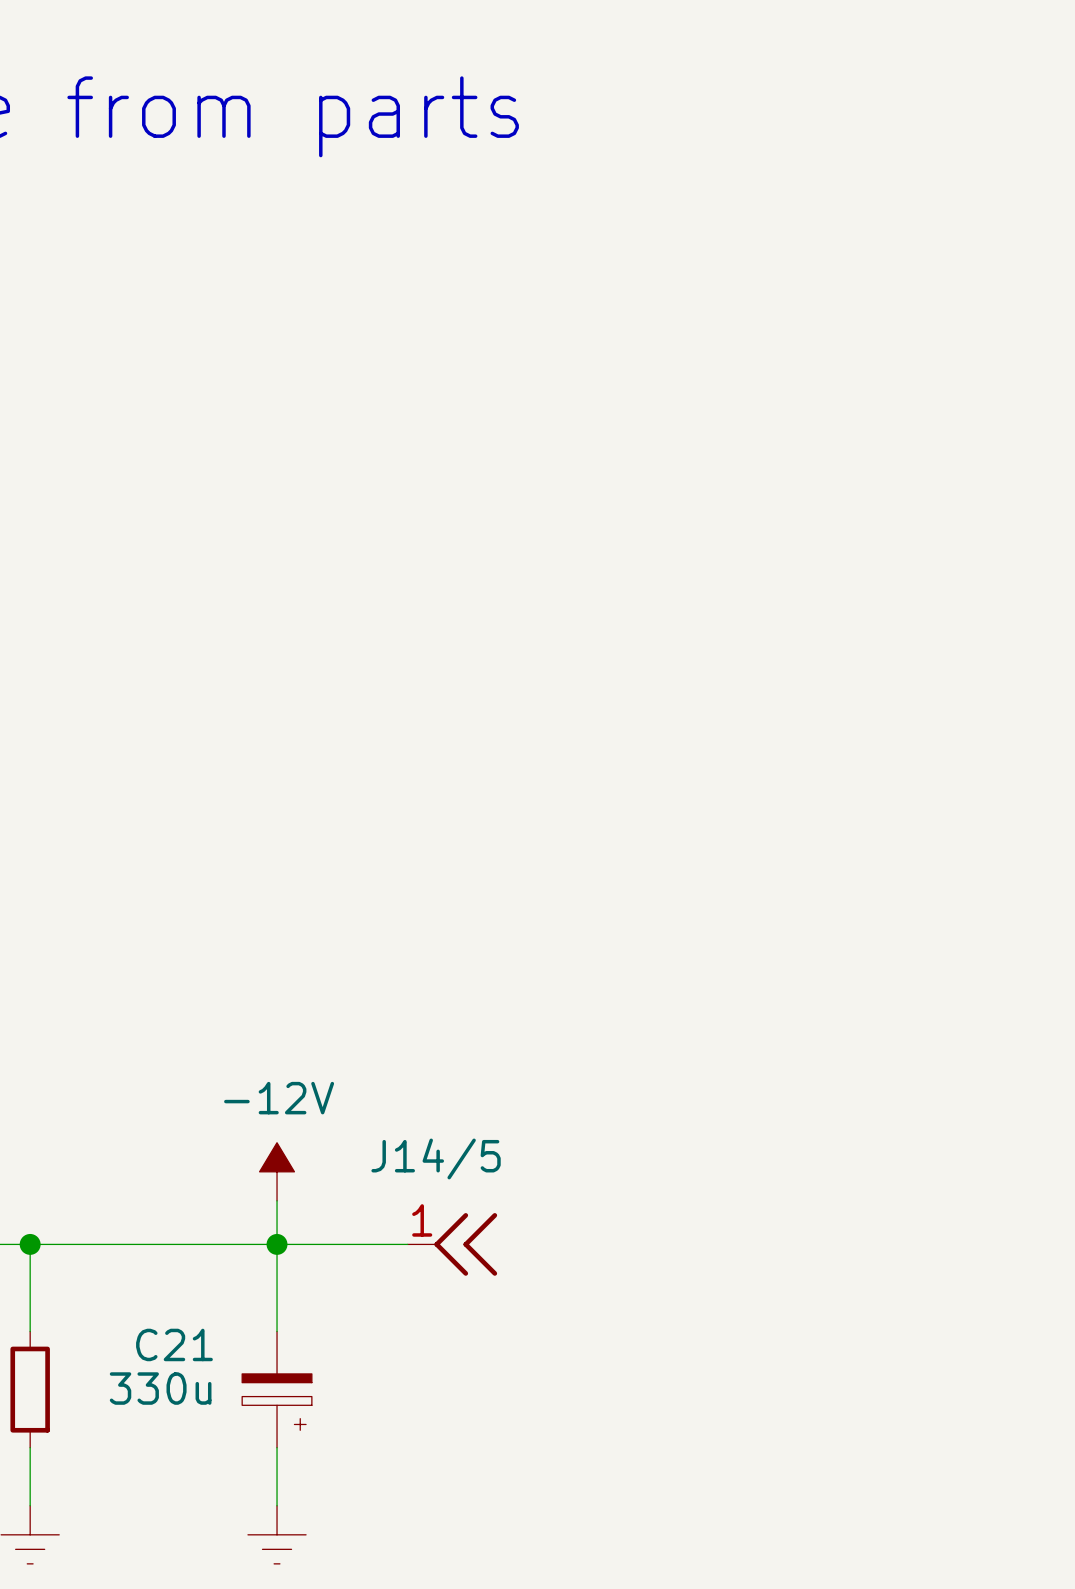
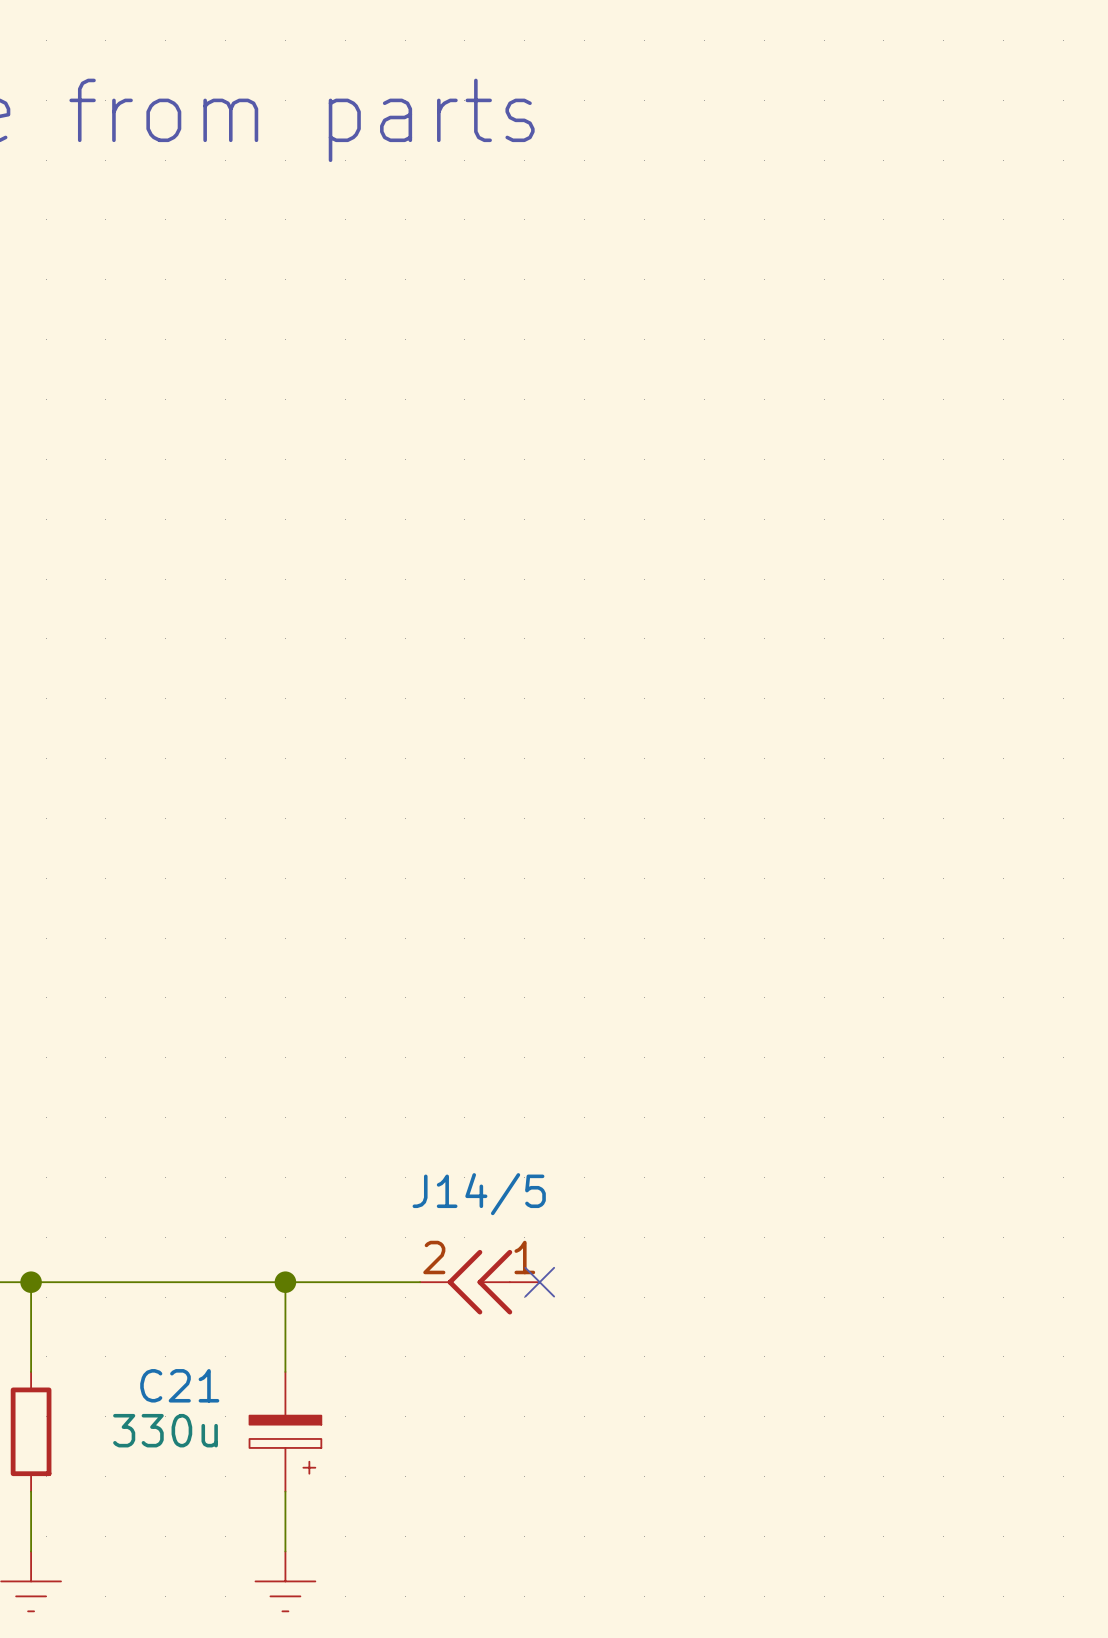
power symbol: -12V (277, 1171) -> none
wire: (277, 1200) (277, 1244) -> none
J14/5 symbol: [407, 1213, 498, 1276] -> [420, 1249, 540, 1315]
no-connect mark: none -> (539, 1282)

